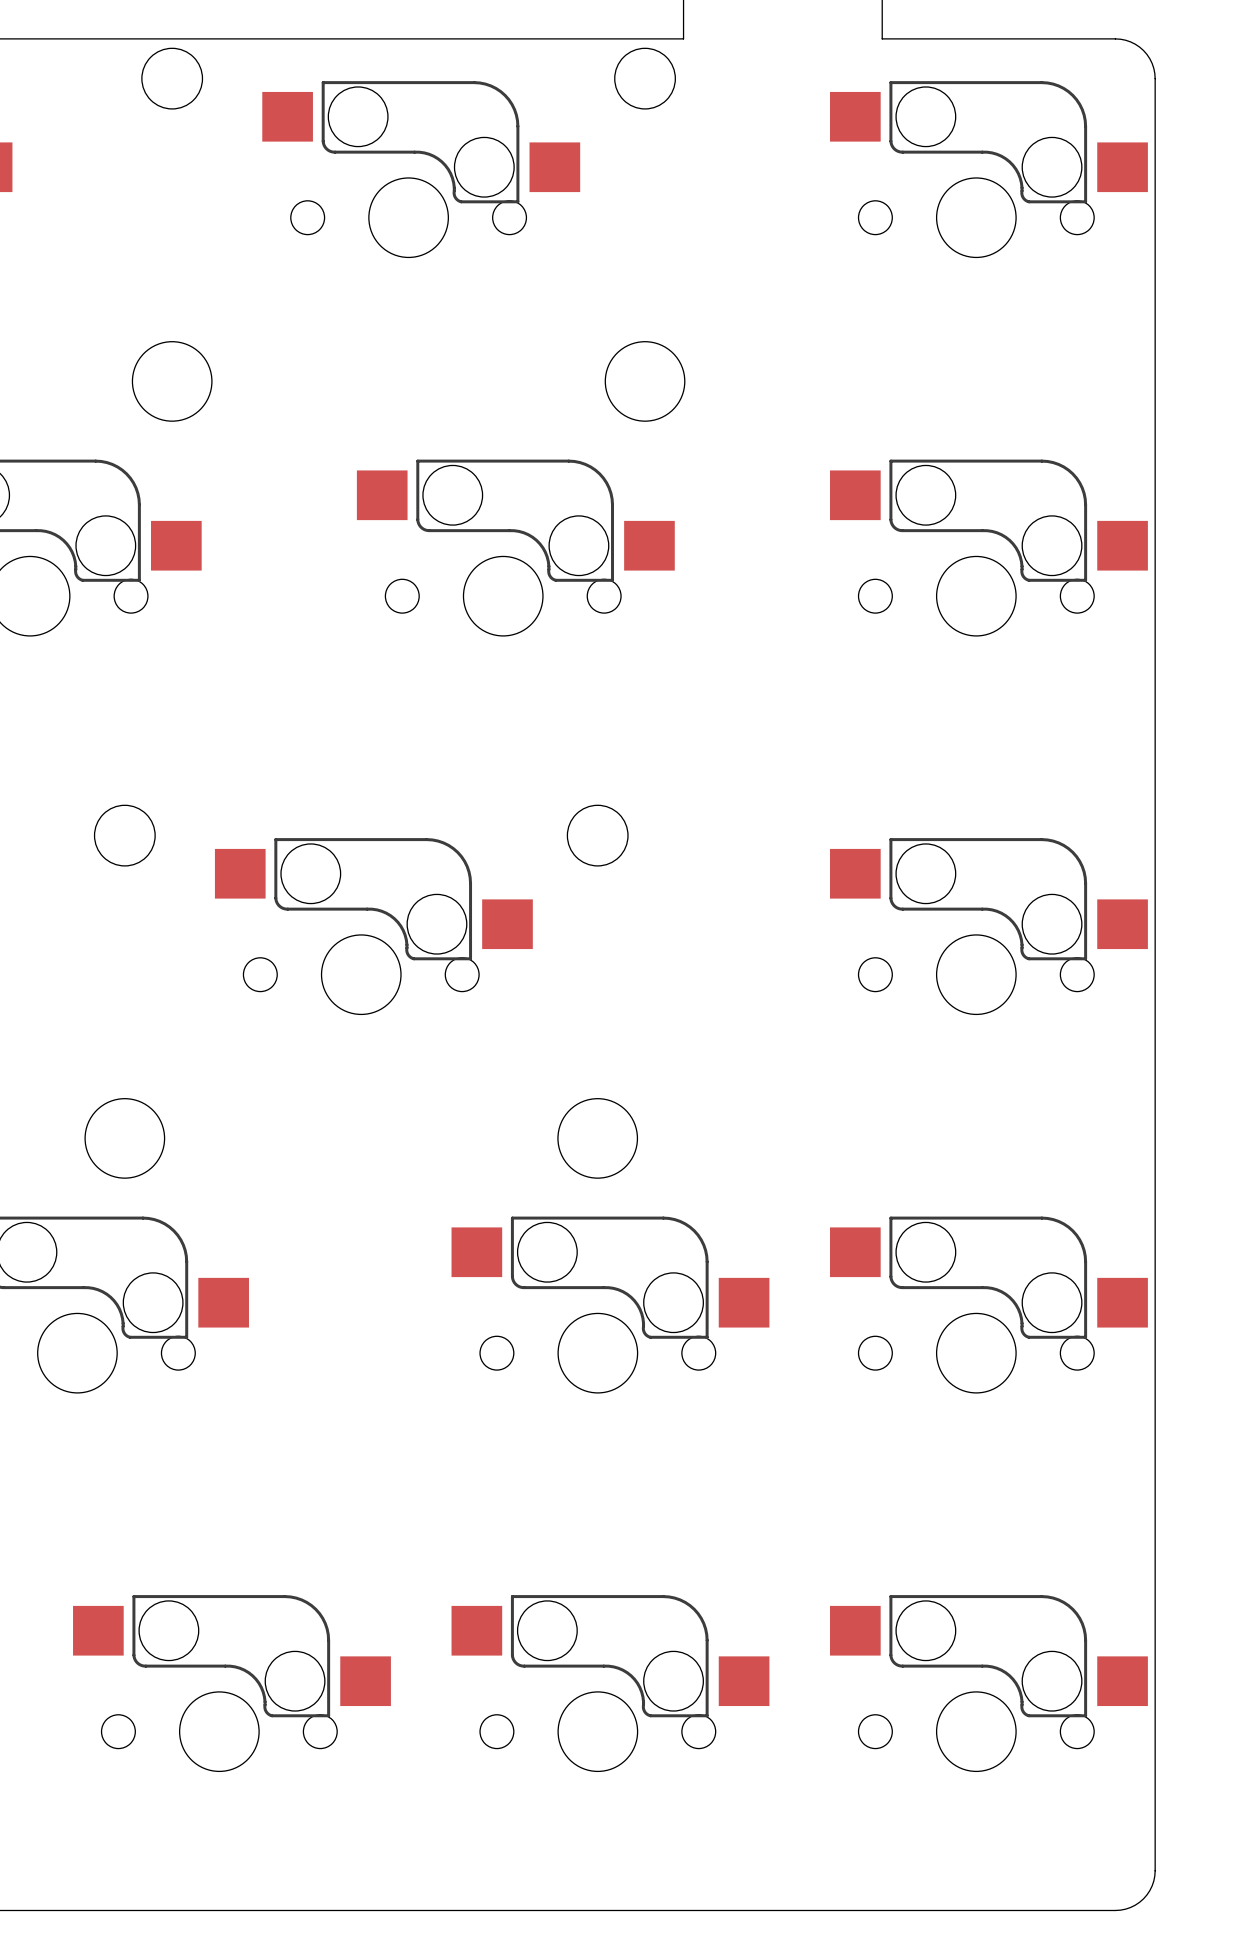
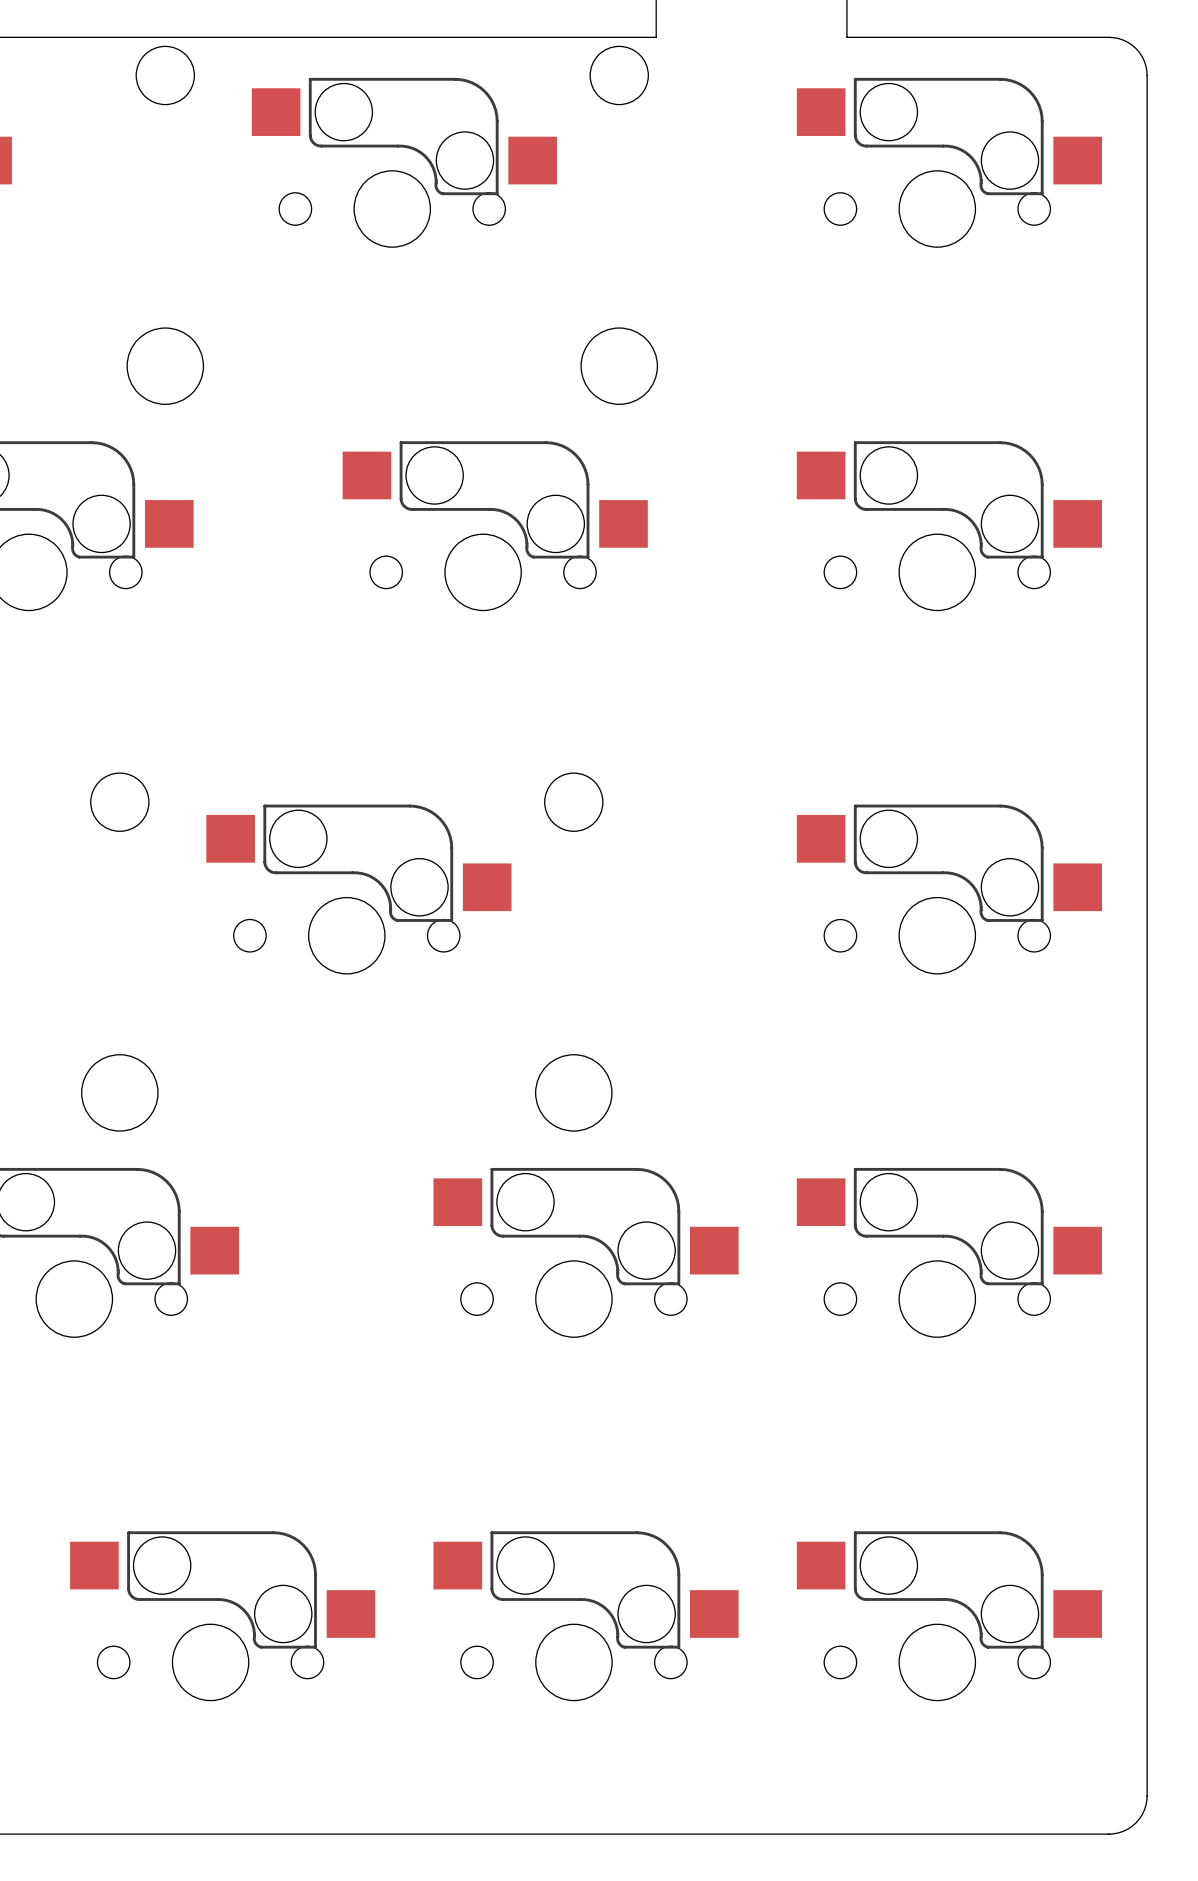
board edge: (1115, 38) (1130, 41) (1143, 50) (1152, 63) (1155, 78) (1155, 1870) (1152, 1885) (1143, 1898) (1130, 1907) (1115, 1910) -> (1070, 37) (1113, 37) (1128, 42) (1142, 56) (1147, 75) (1147, 1795) (1142, 1815) (1128, 1828) (1113, 1833) (1070, 1834)

